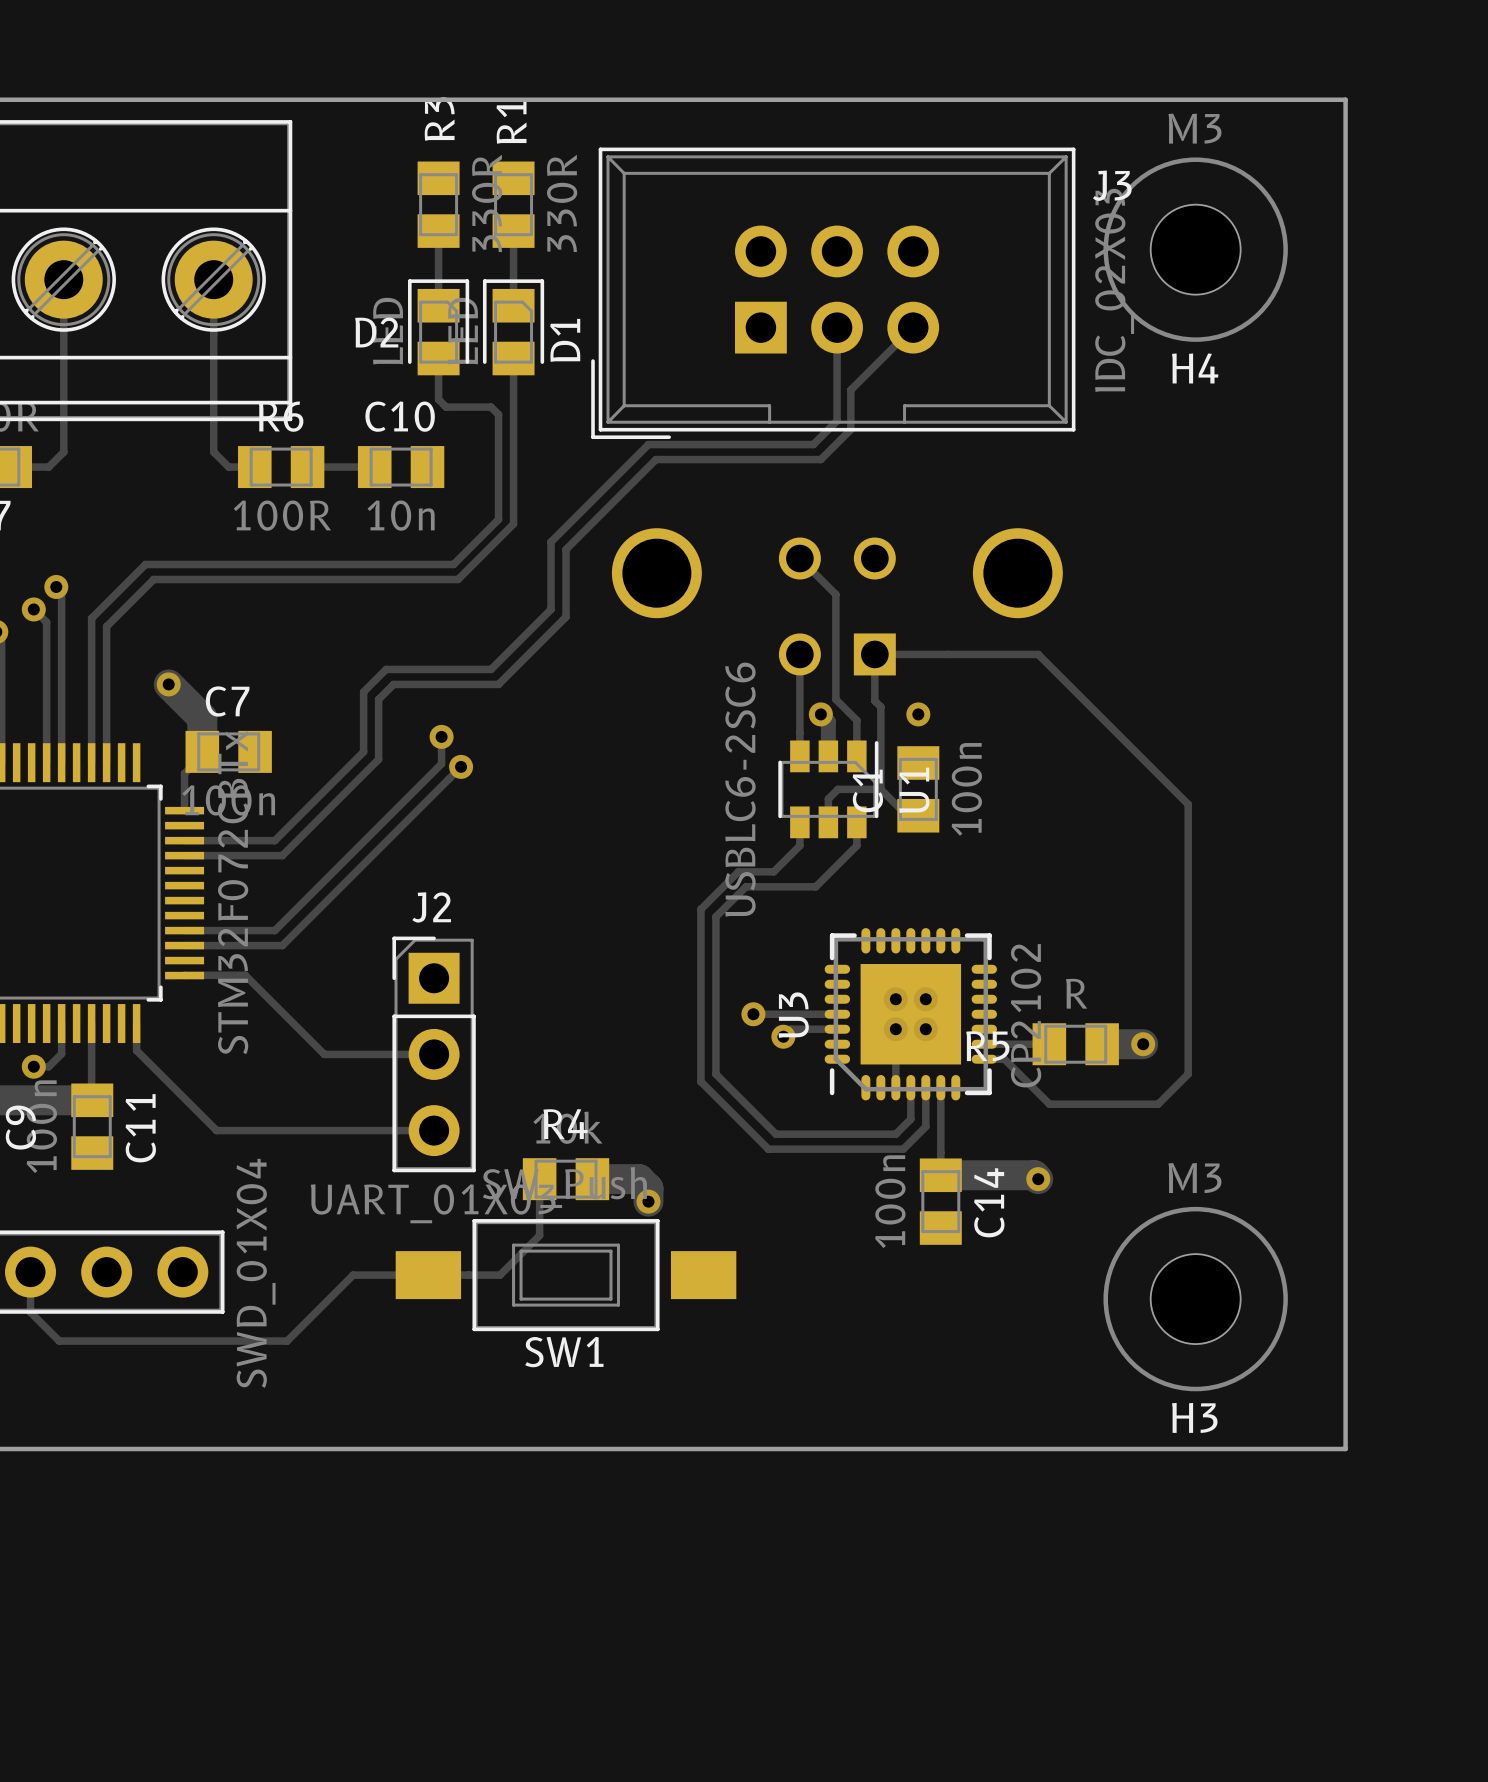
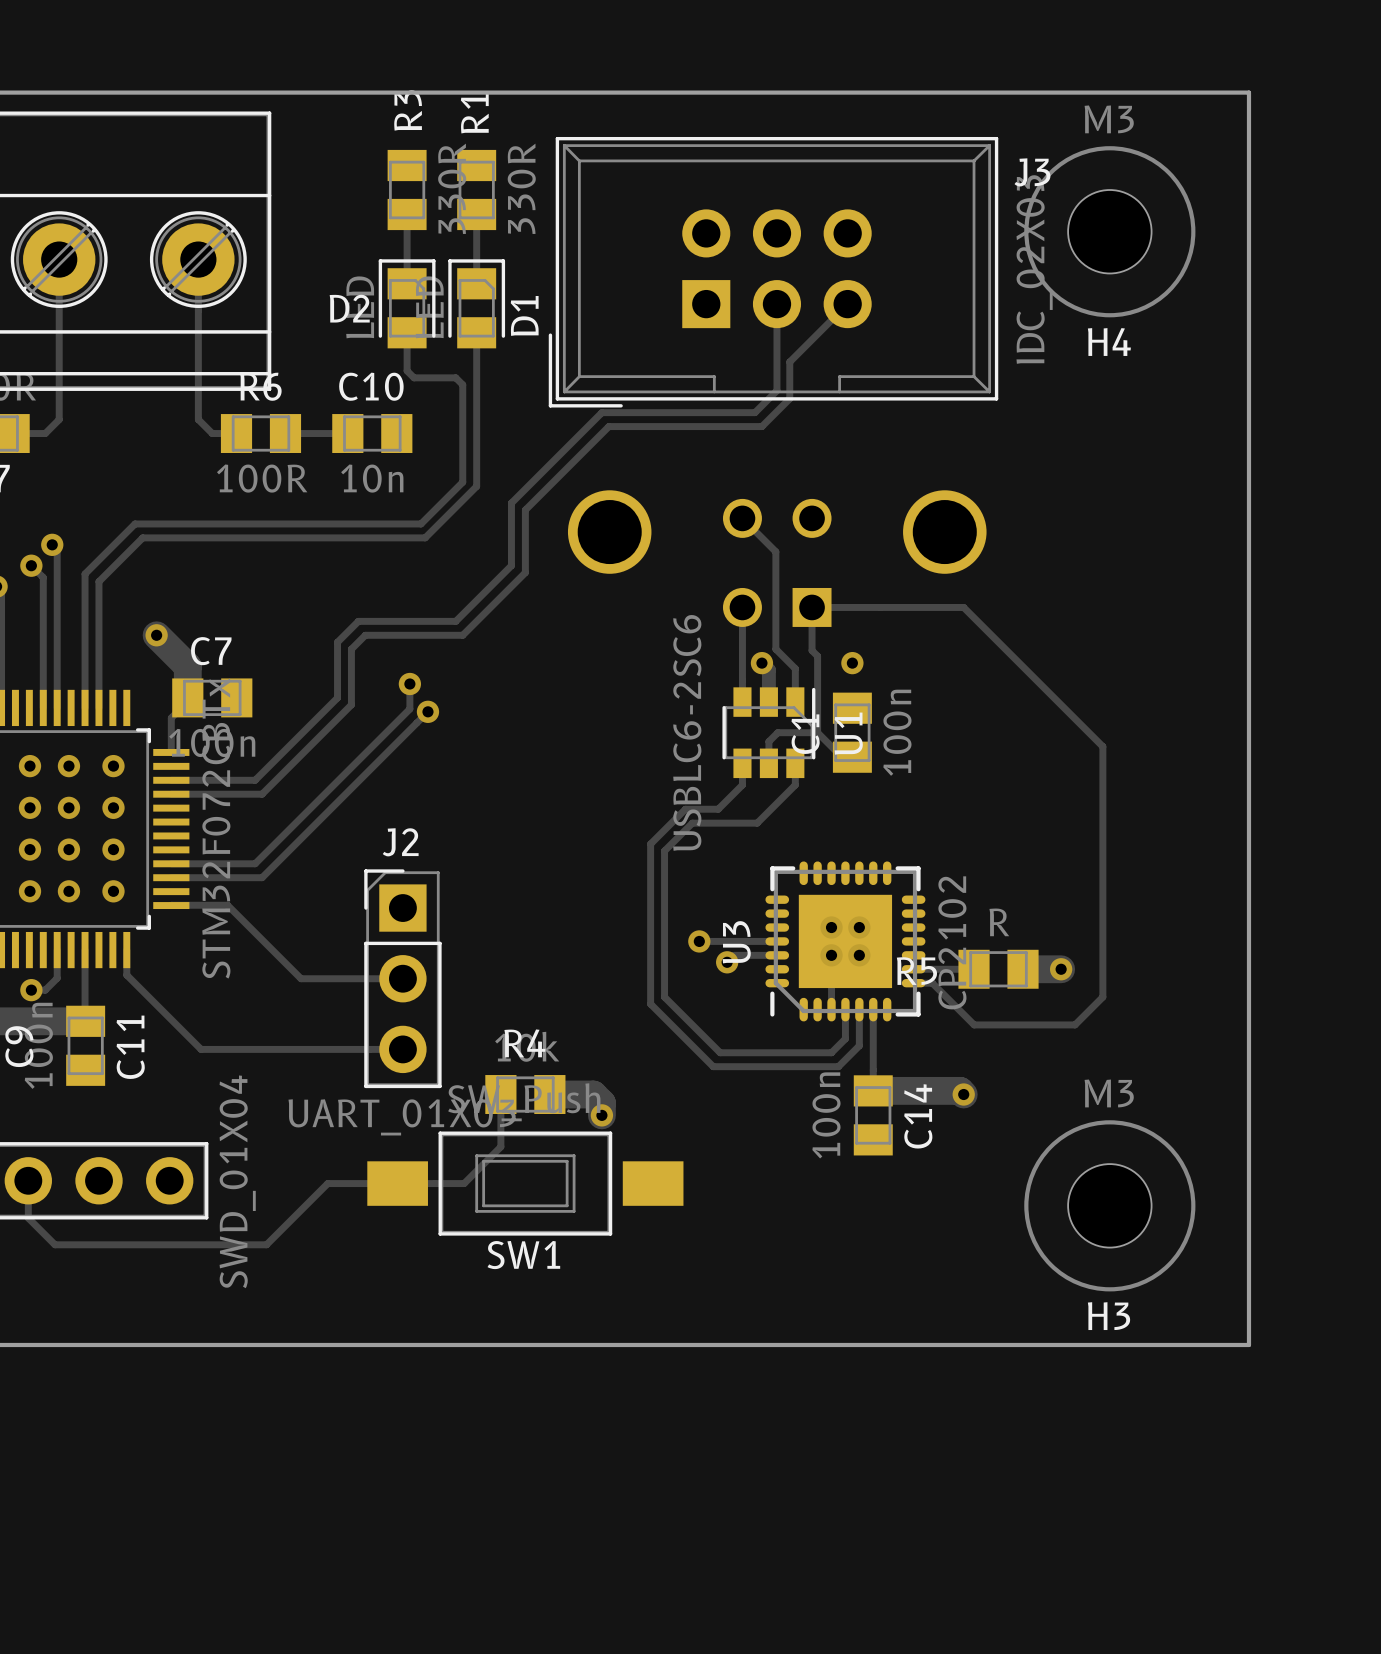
via: none -> (29, 766)
via: none -> (68, 766)
via: none -> (113, 766)
via: none -> (29, 807)
via: none -> (68, 807)
via: none -> (113, 807)
via: none -> (29, 849)
via: none -> (68, 849)
via: none -> (113, 849)
via: none -> (29, 891)
via: none -> (68, 891)
via: none -> (113, 891)

